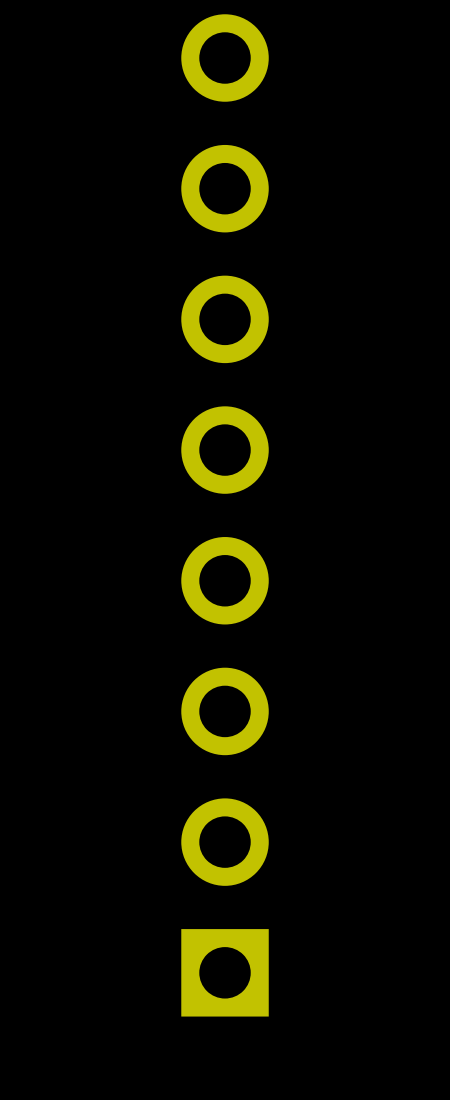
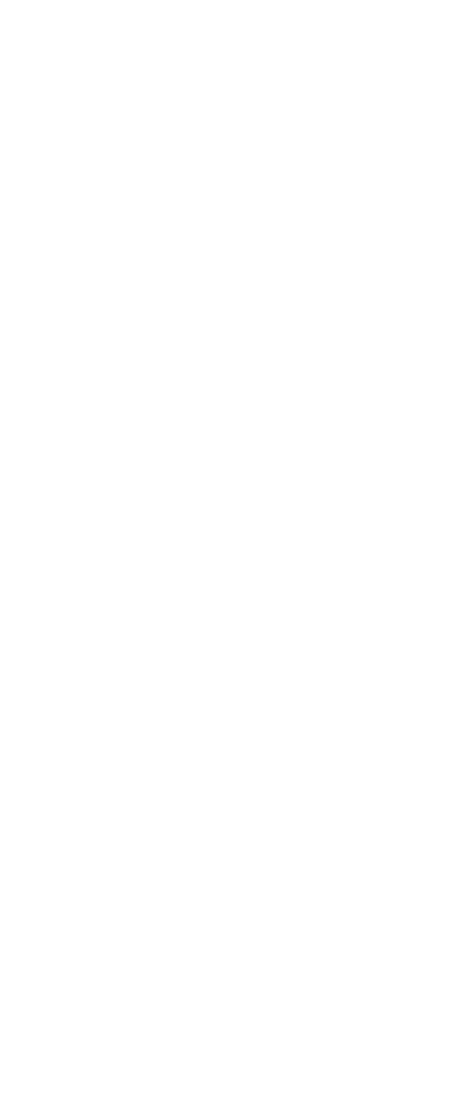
part: (225, 515) -> none

